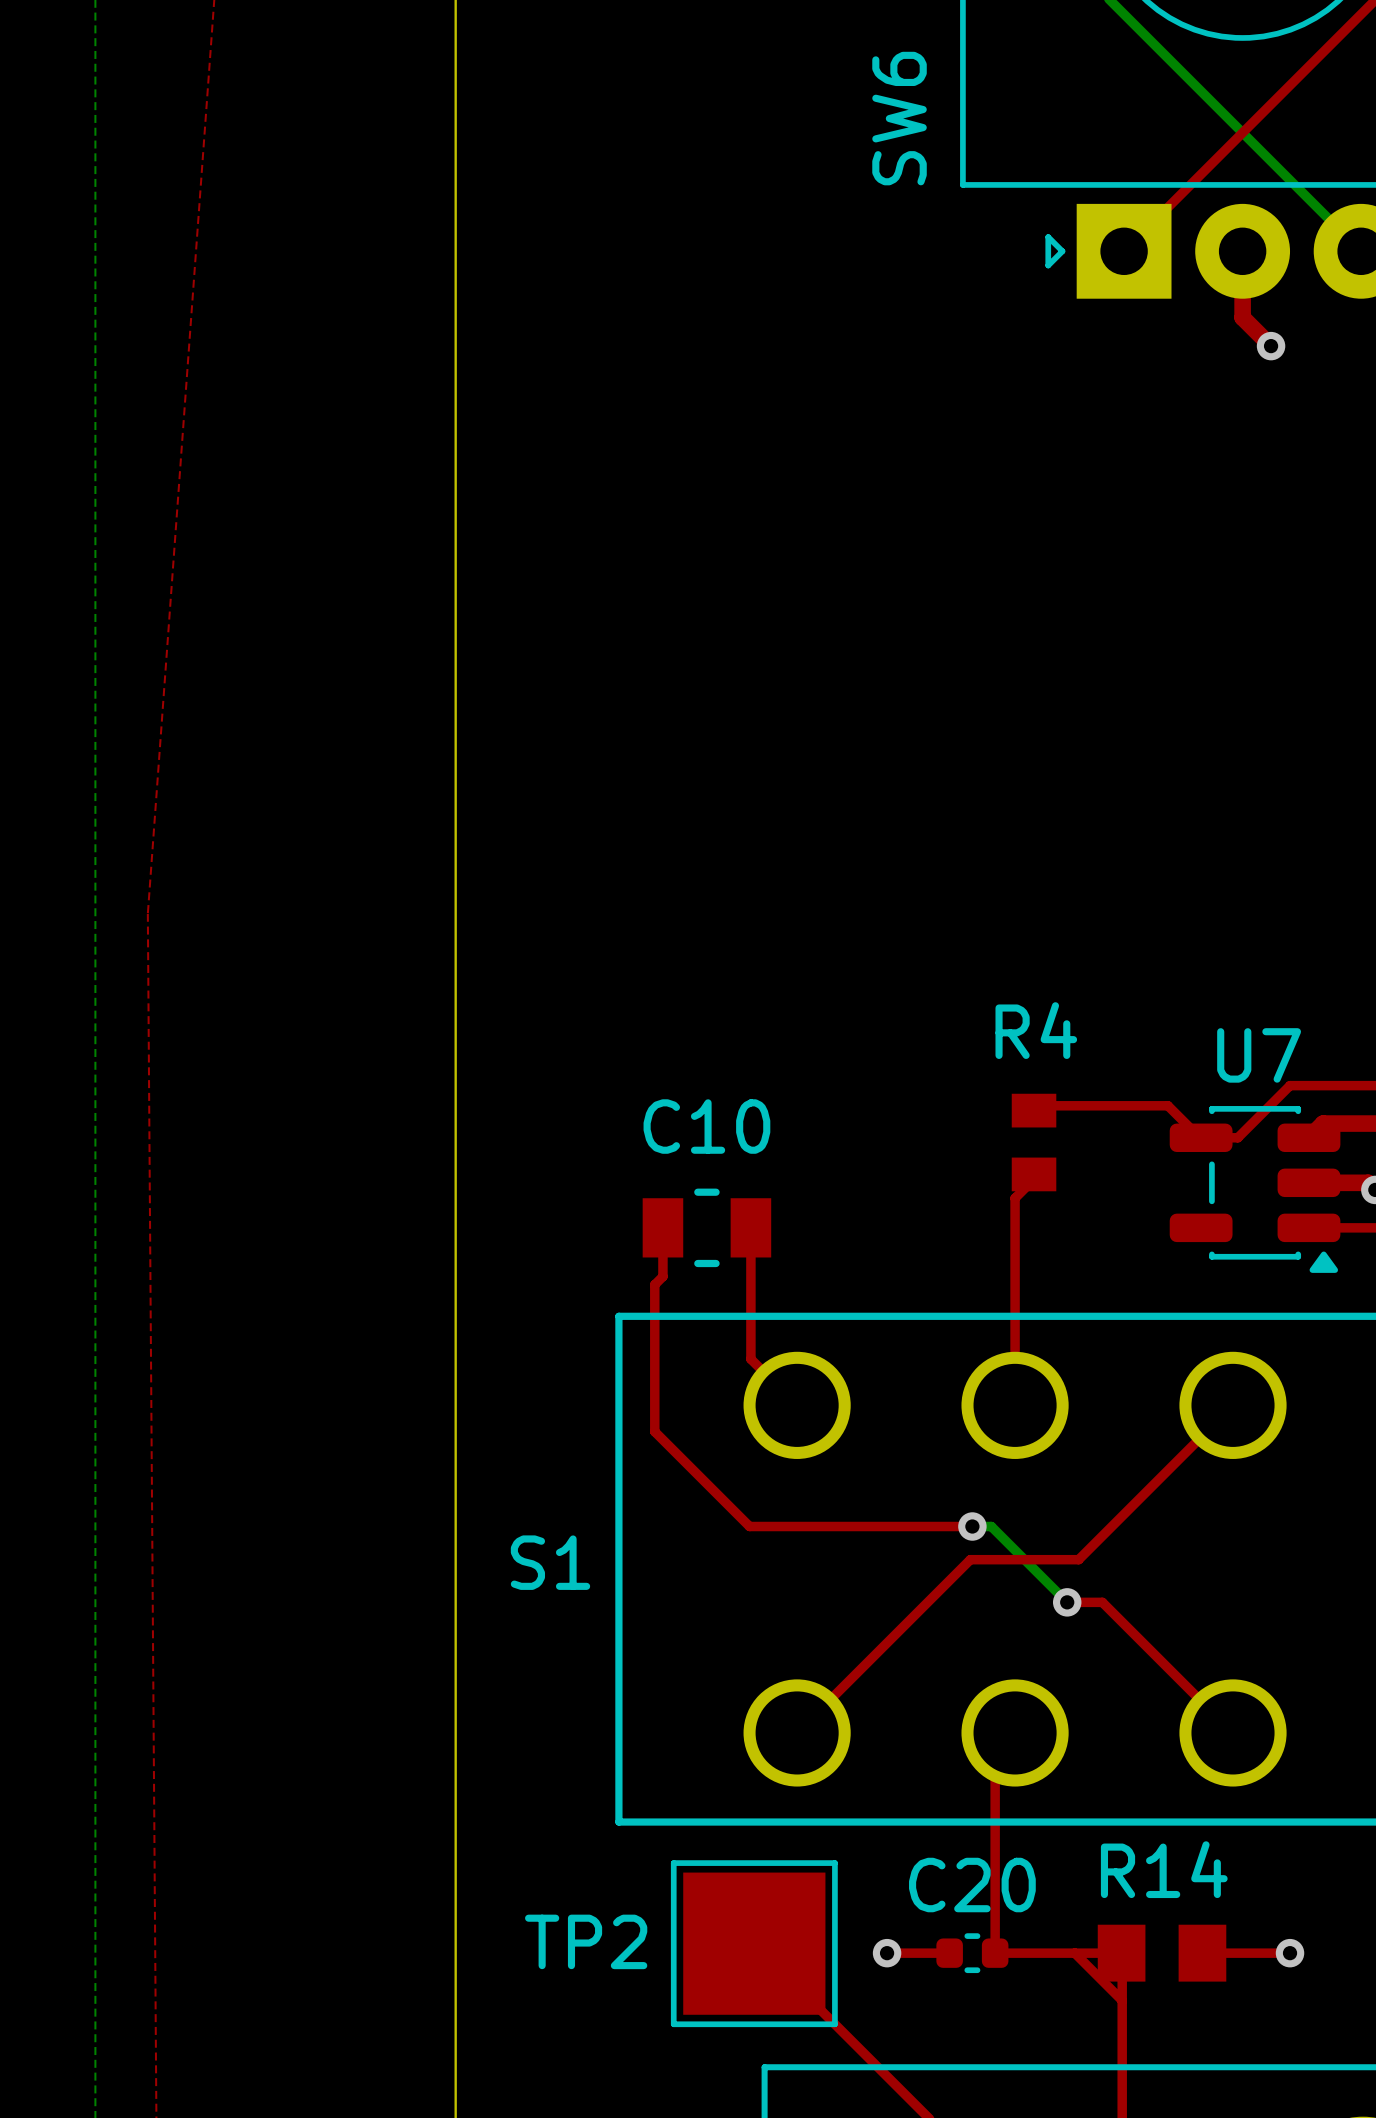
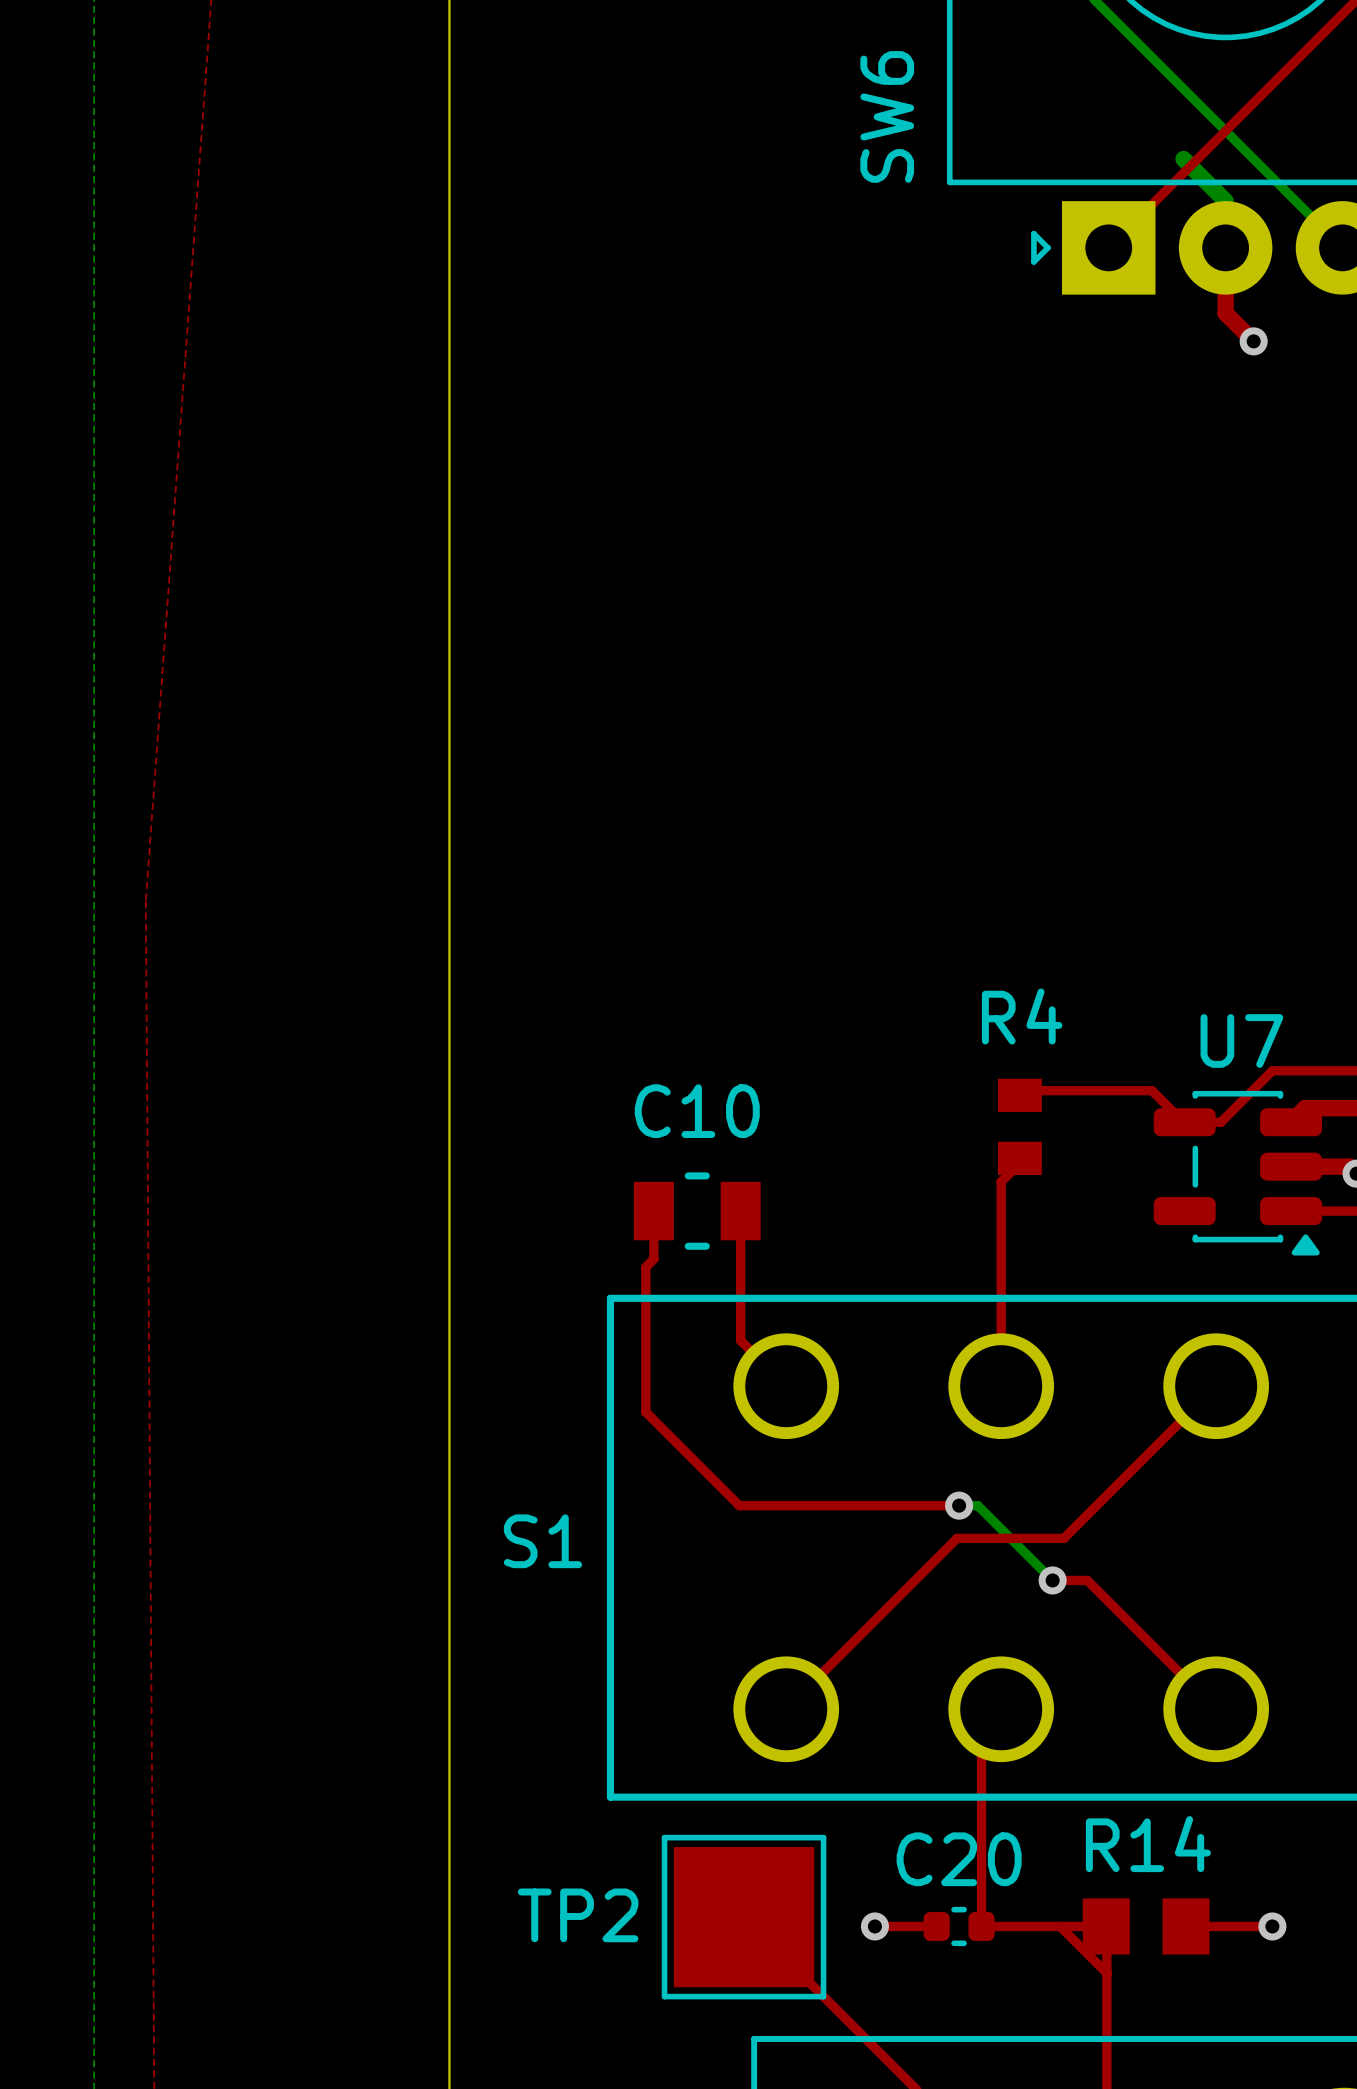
bottom track: none -> (1183, 159) (1225, 201)

